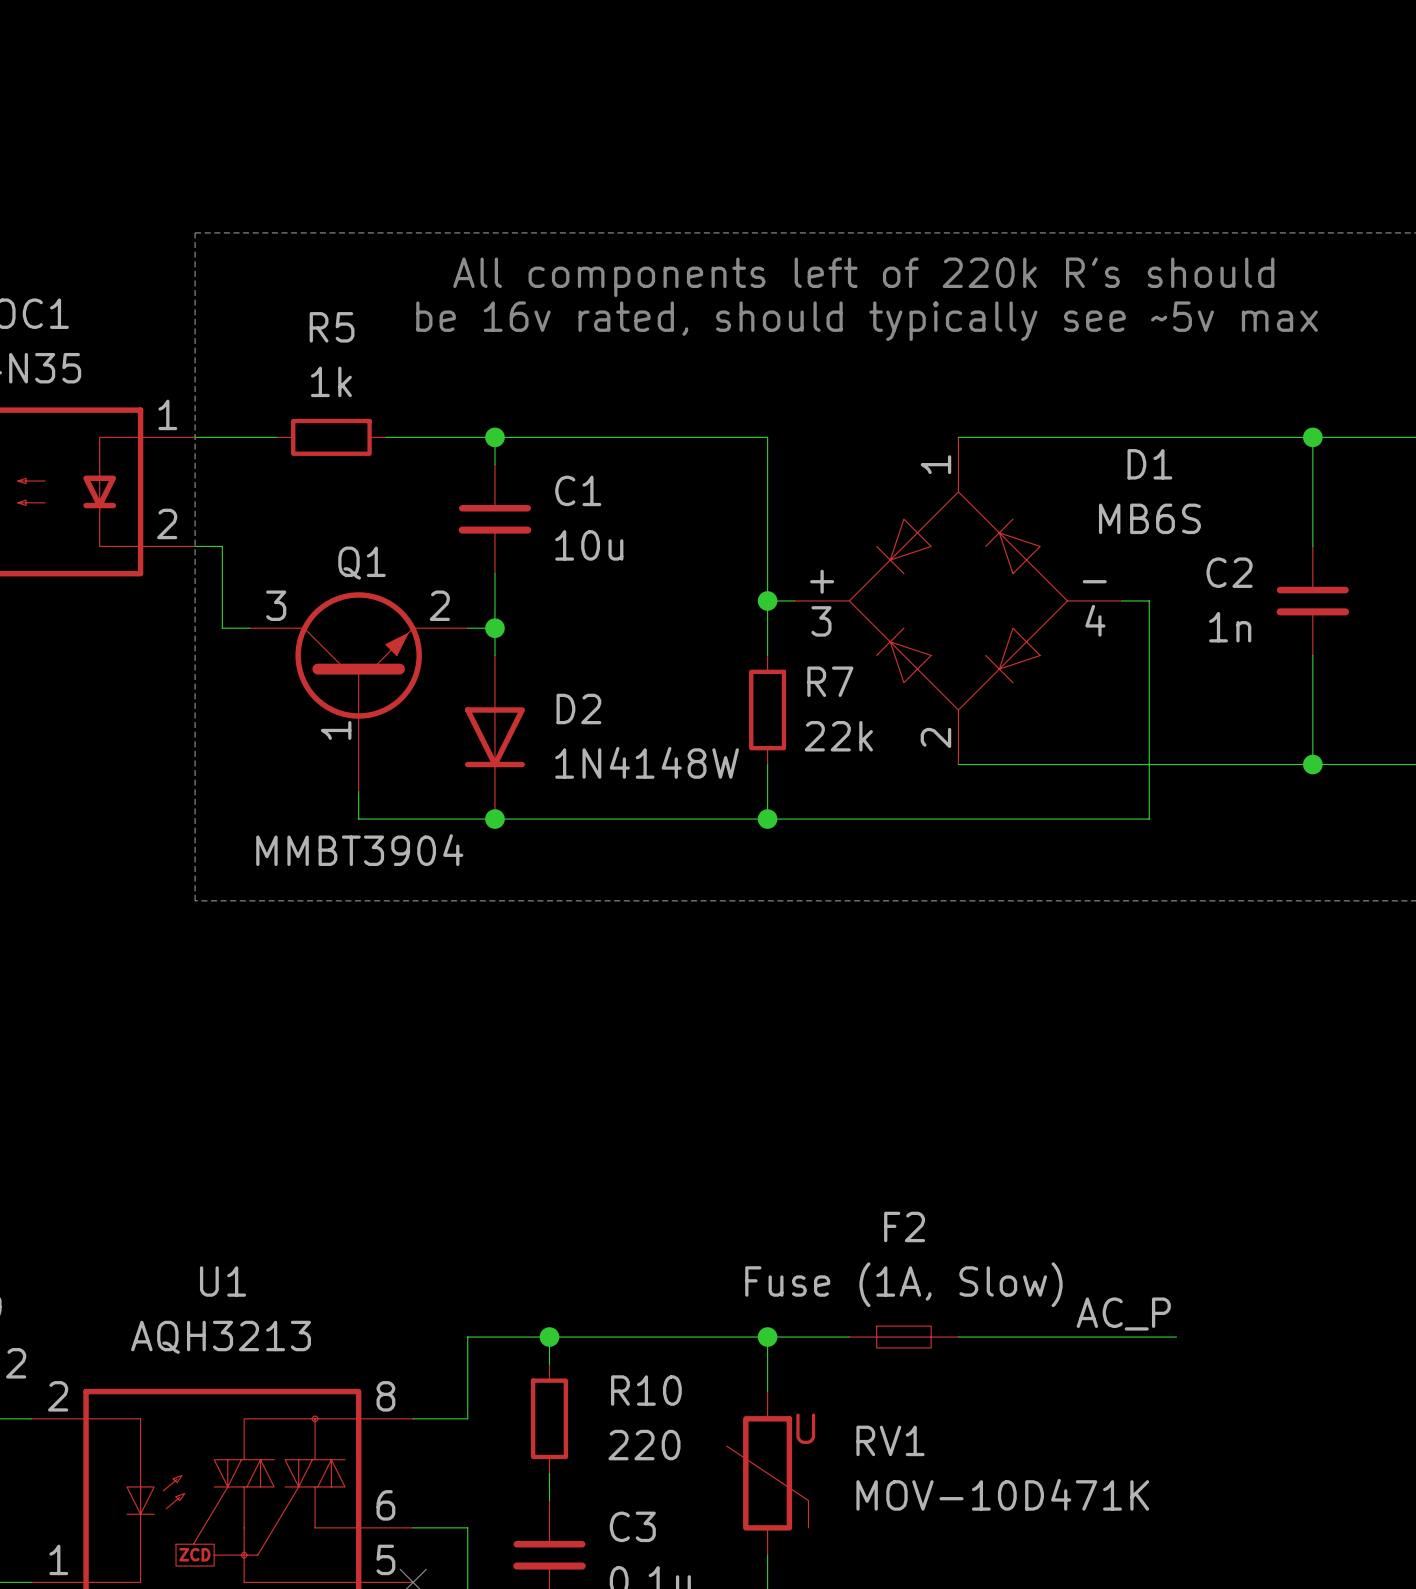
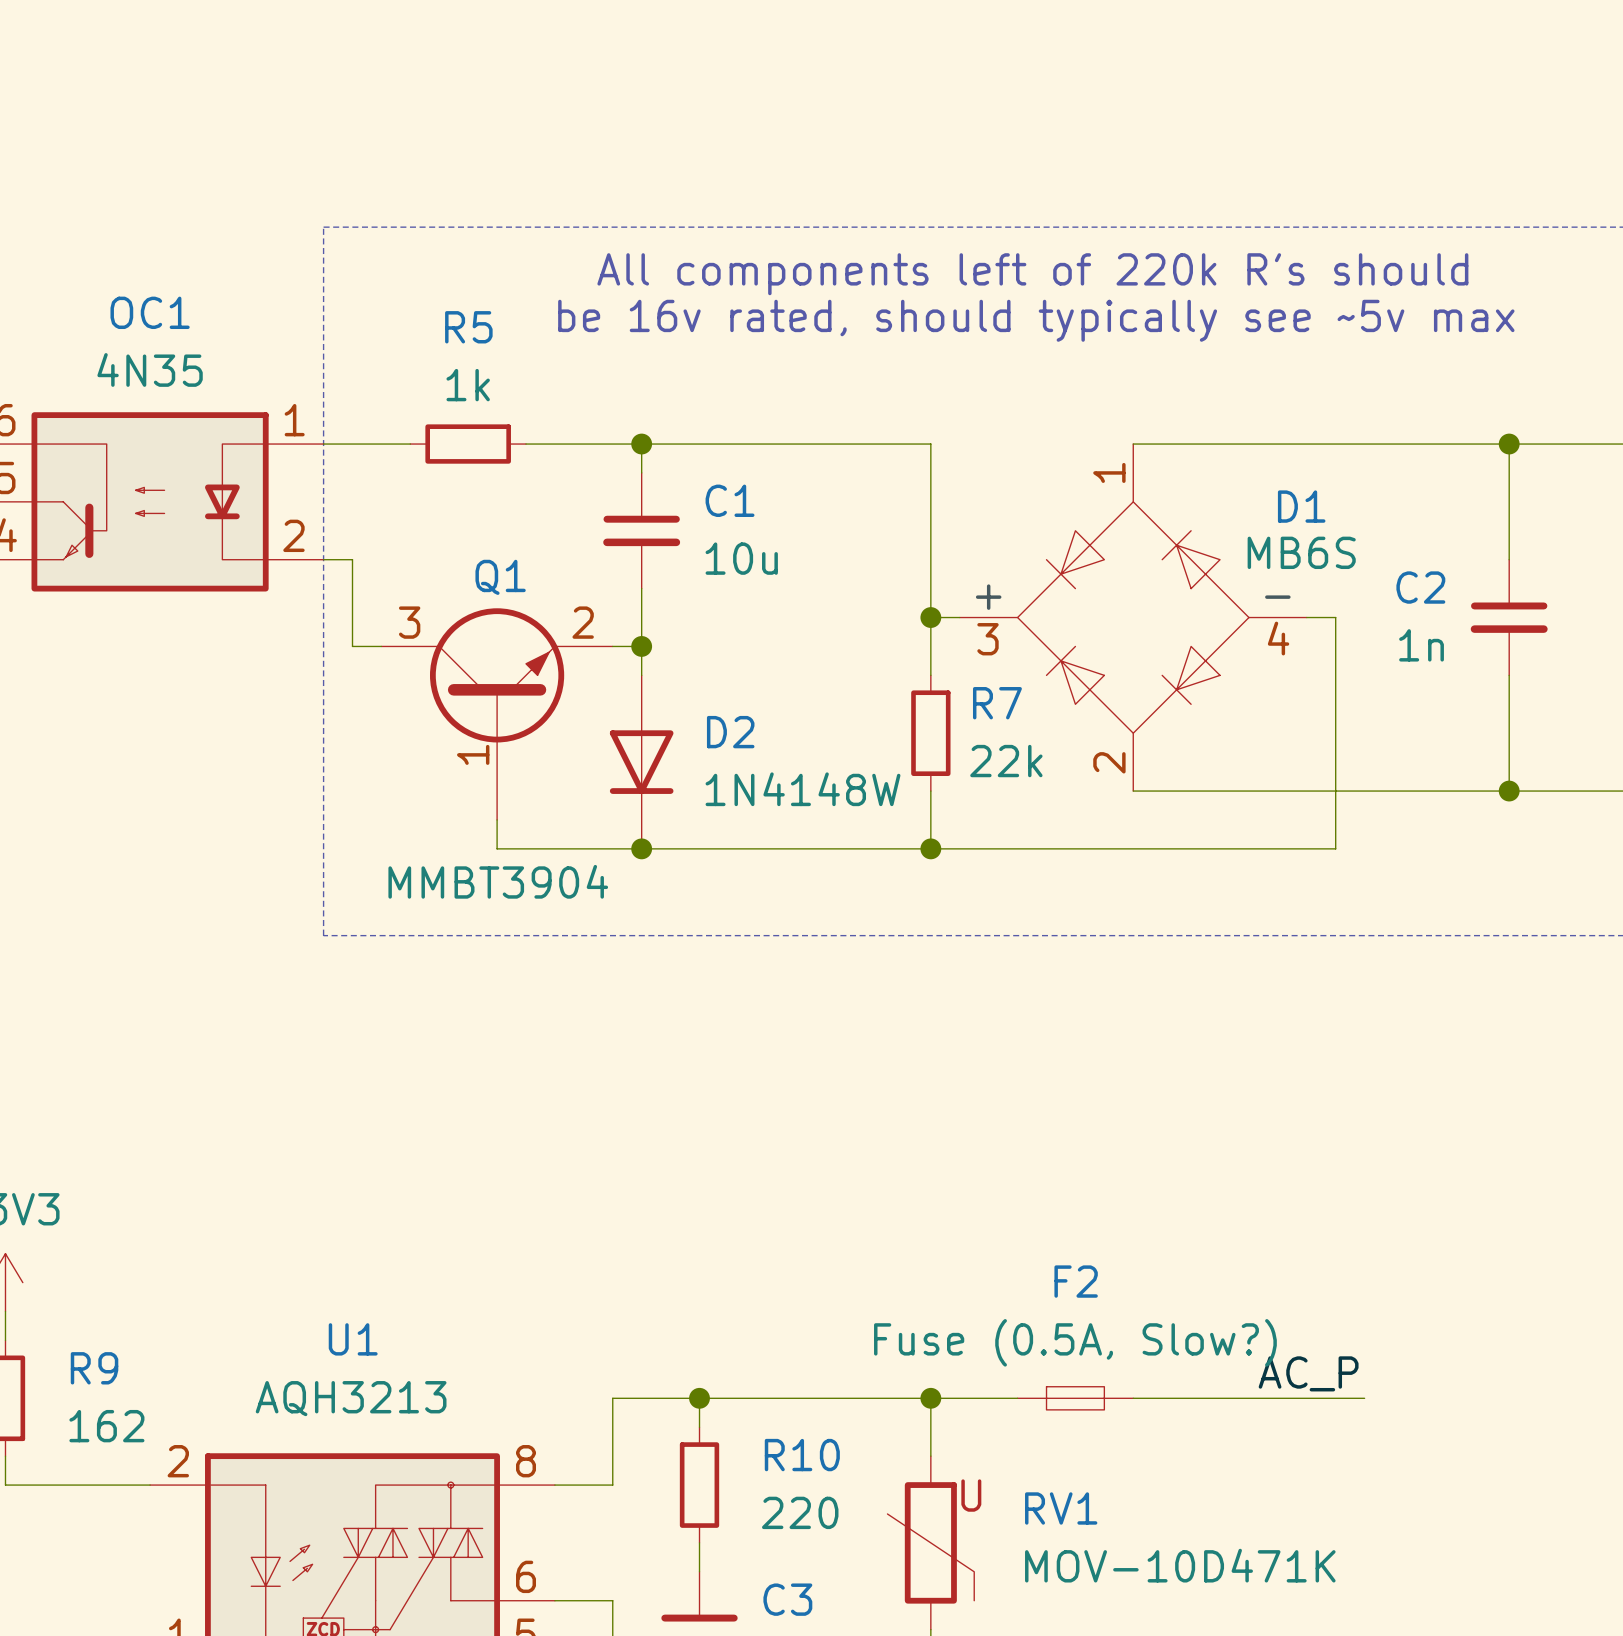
D1 name position: D1 (1149, 464) -> D1 (1301, 506)
D1 value position: MB6S (1149, 518) -> MB6S (1301, 552)
F2 value: Fuse (1A, Slow) (903, 1284) -> Fuse (0.5A, Slow?) (1075, 1342)

